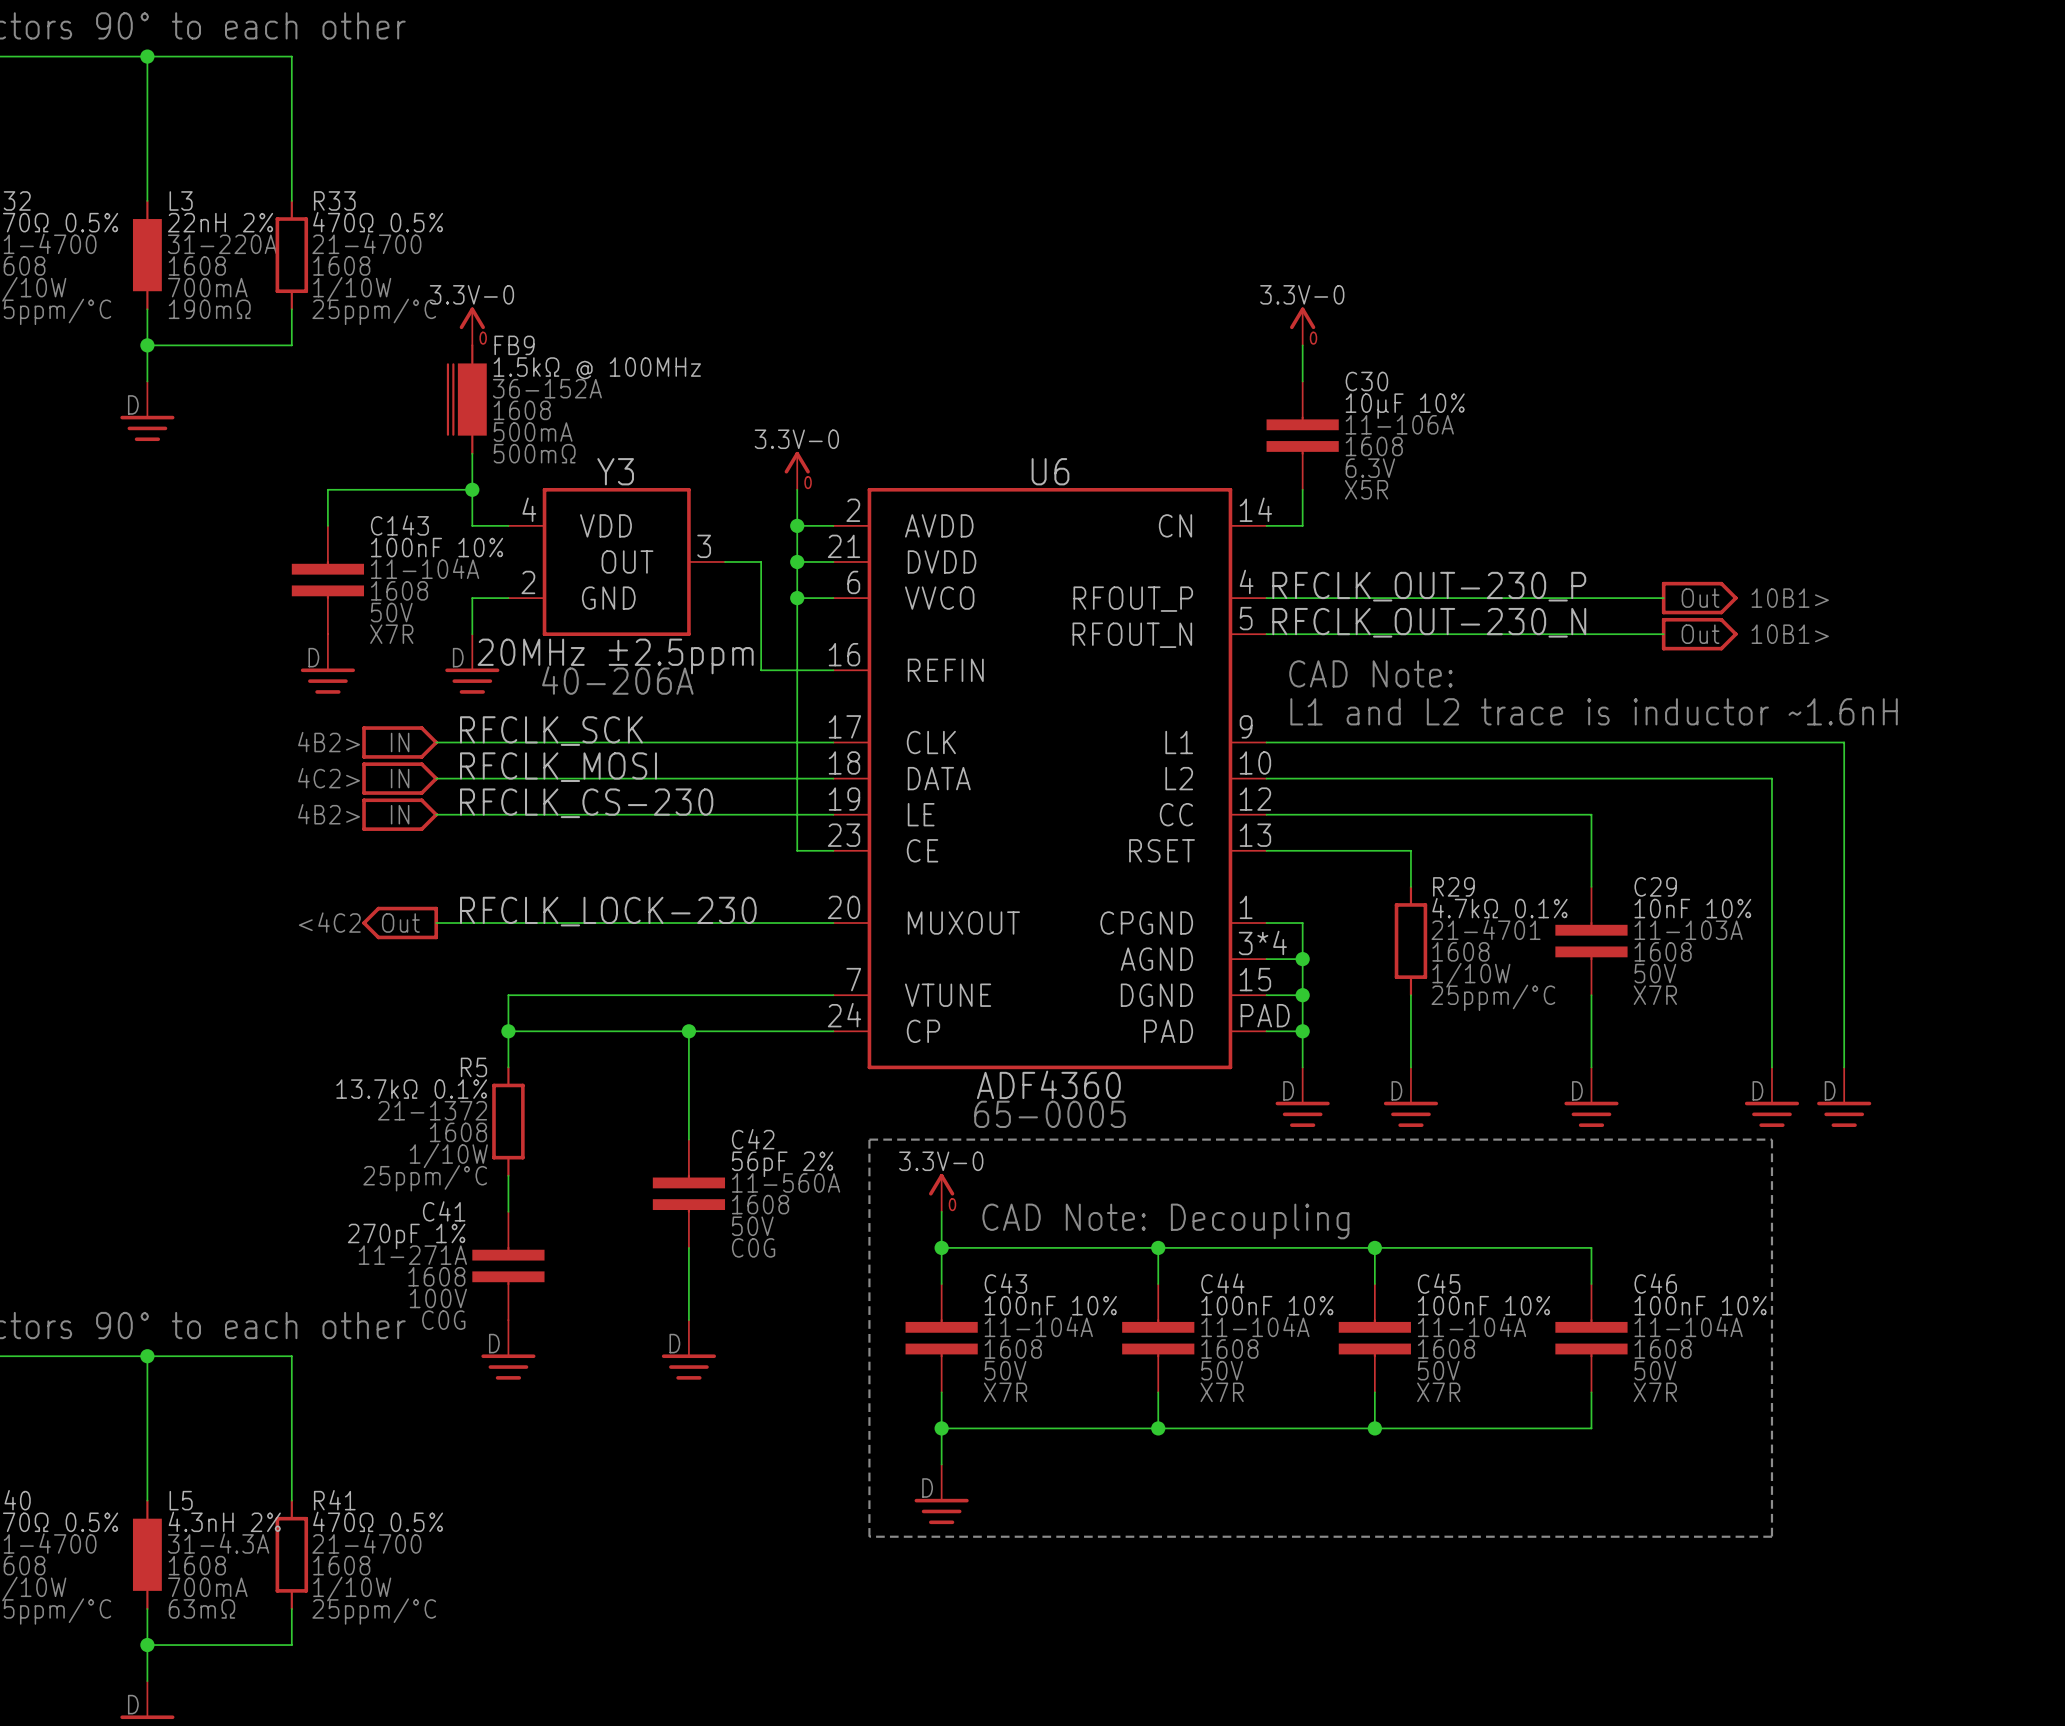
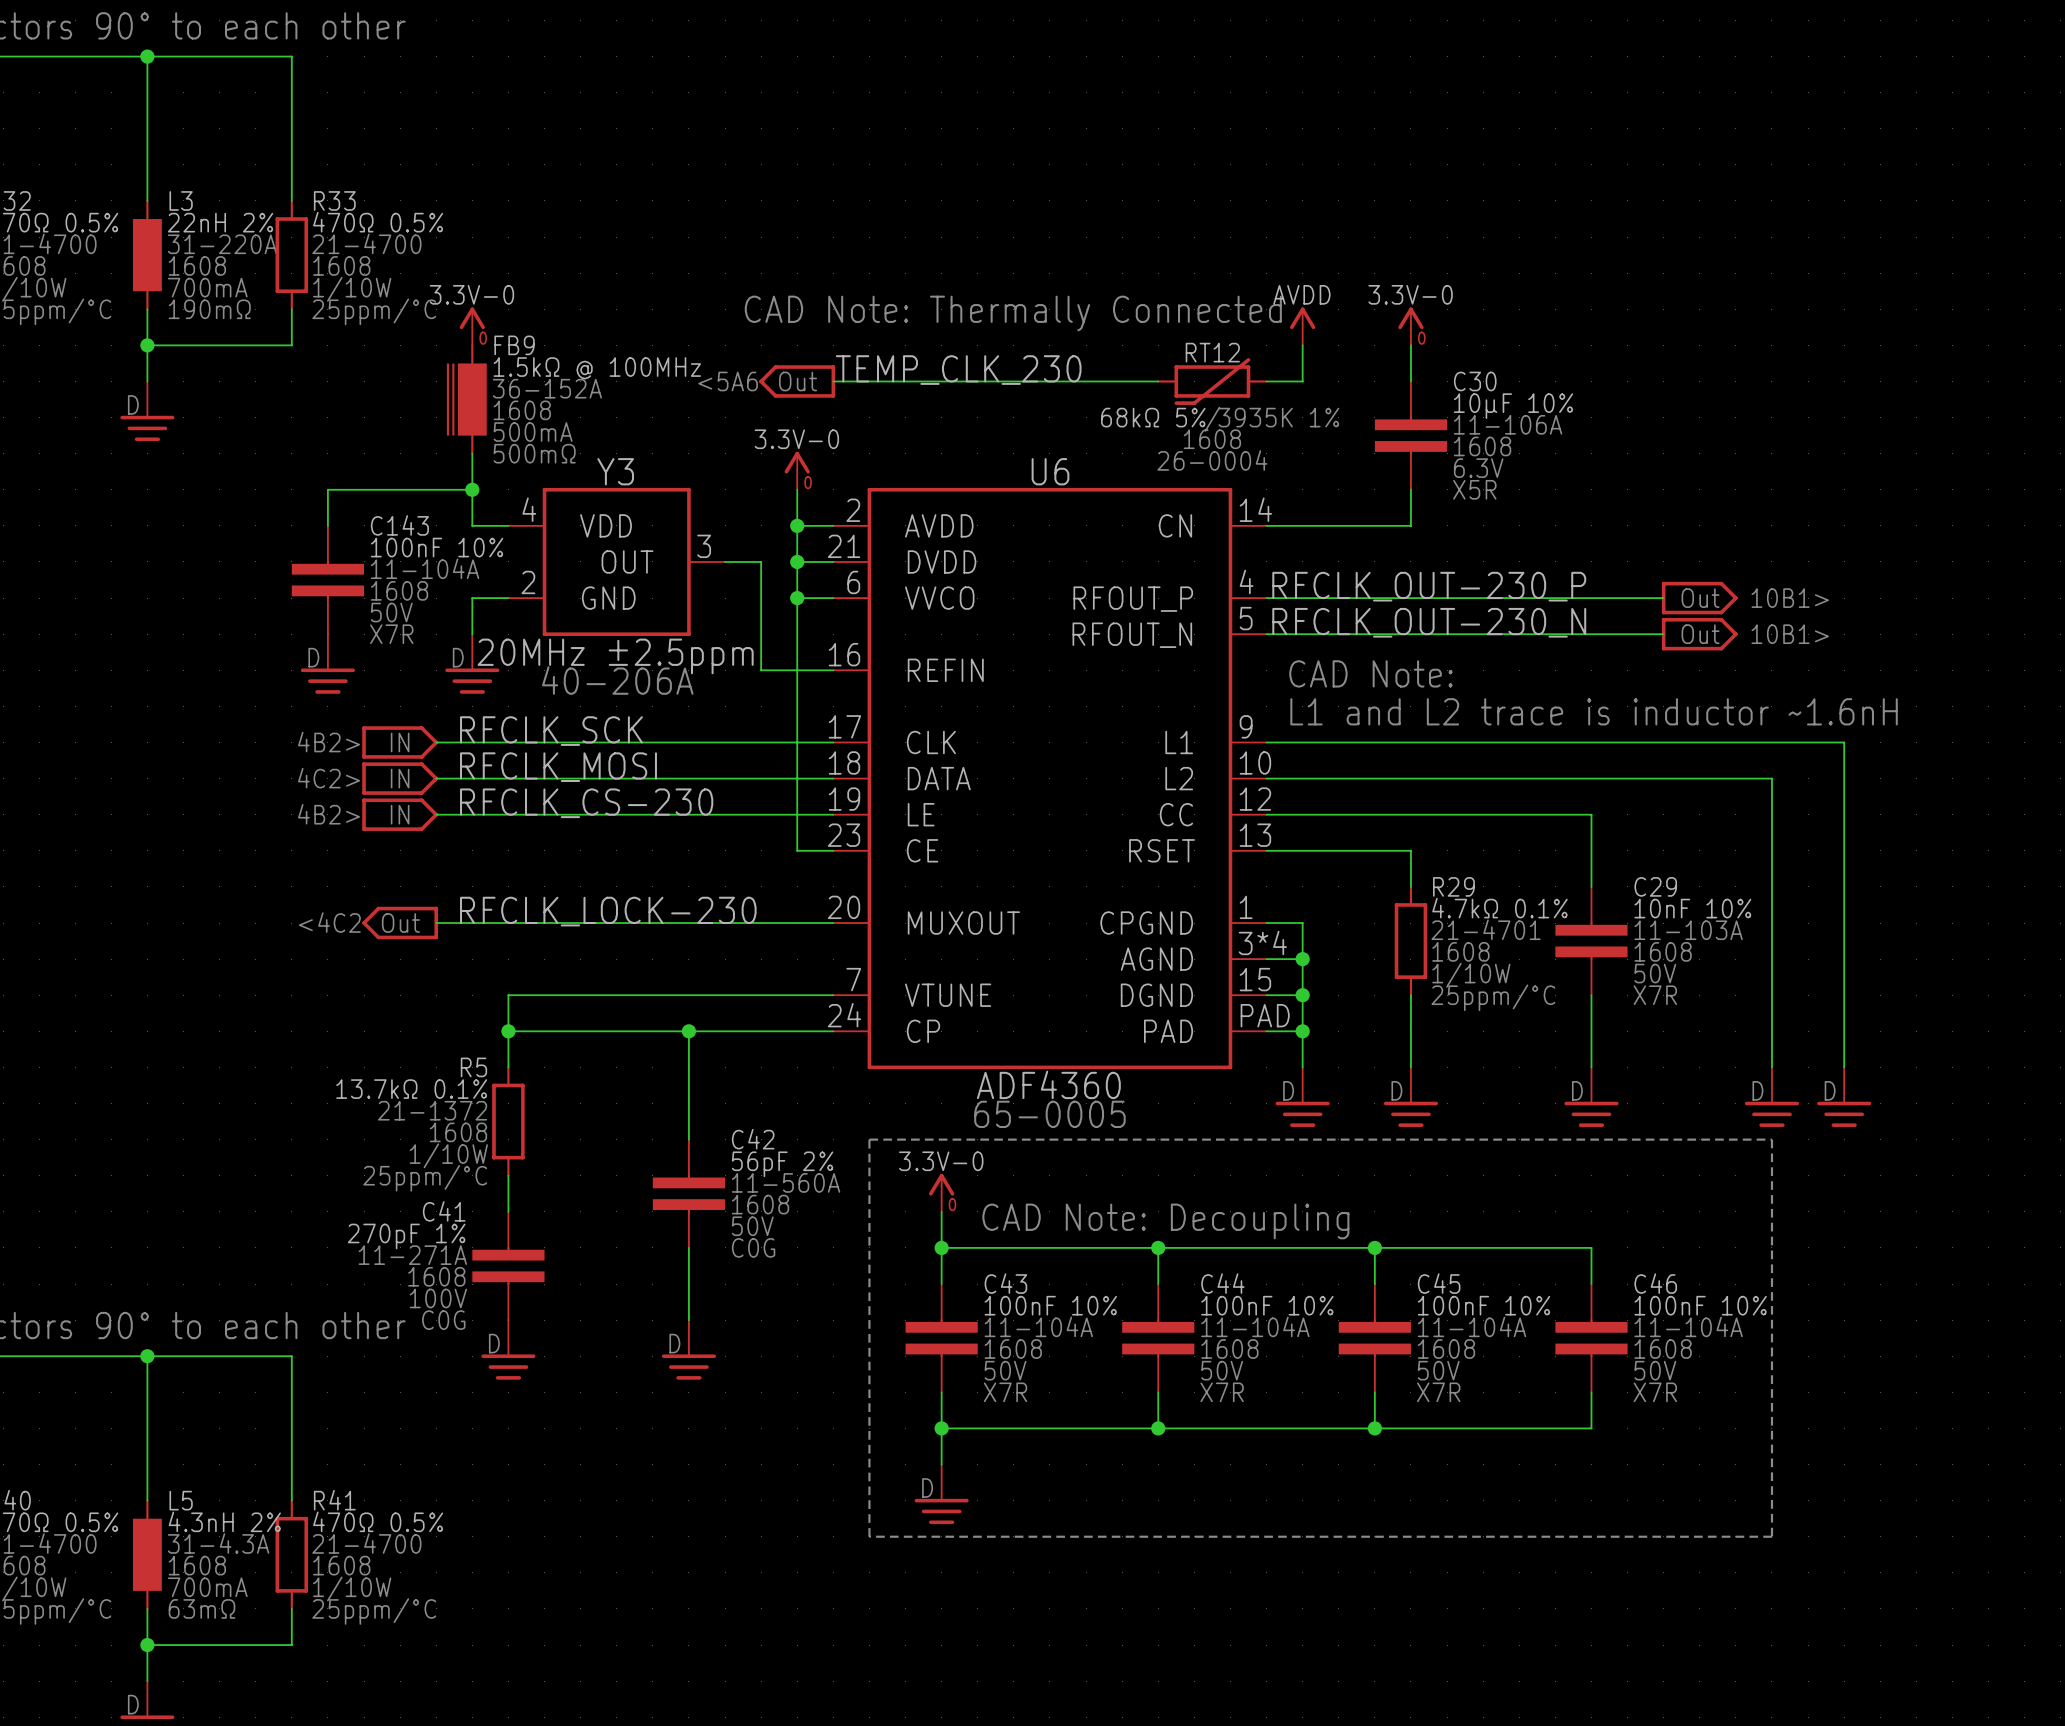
text: none -> CAD Note: Thermally Connected (1013, 313)
power symbol: 3.3V-0 (1302, 326) -> AVDD (1302, 326)
power symbol: none -> 3.3V-0 (1410, 326)
wire: none -> (1410, 345) (1410, 381)
label: none -> TEMP_CLK_230 (958, 370)
text: none -> <5A6 (728, 381)
part: none -> (797, 381)
wire: none -> (833, 381) (1158, 381)
RT12: none -> 68kΩ 5% (1212, 381)
wire: none -> (1266, 381) (1302, 381)
C30 position: (1302, 435) -> (1410, 435)
wire: (1302, 489) (1302, 525) -> (1410, 489) (1410, 525) (1302, 525)

